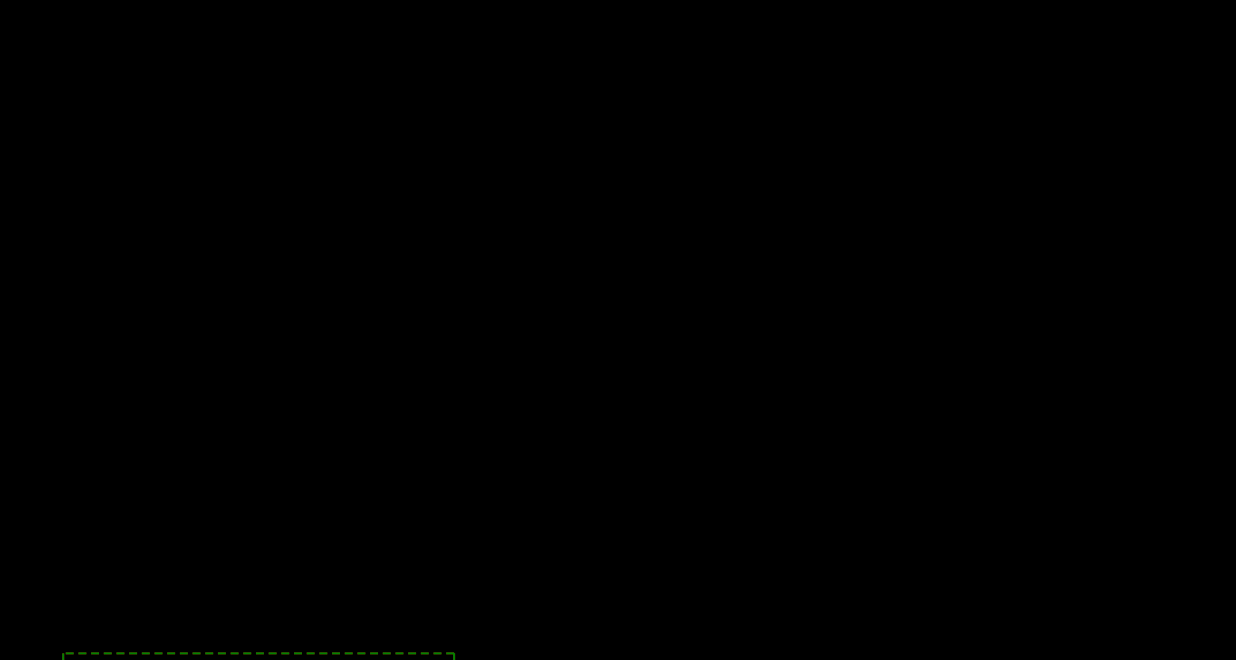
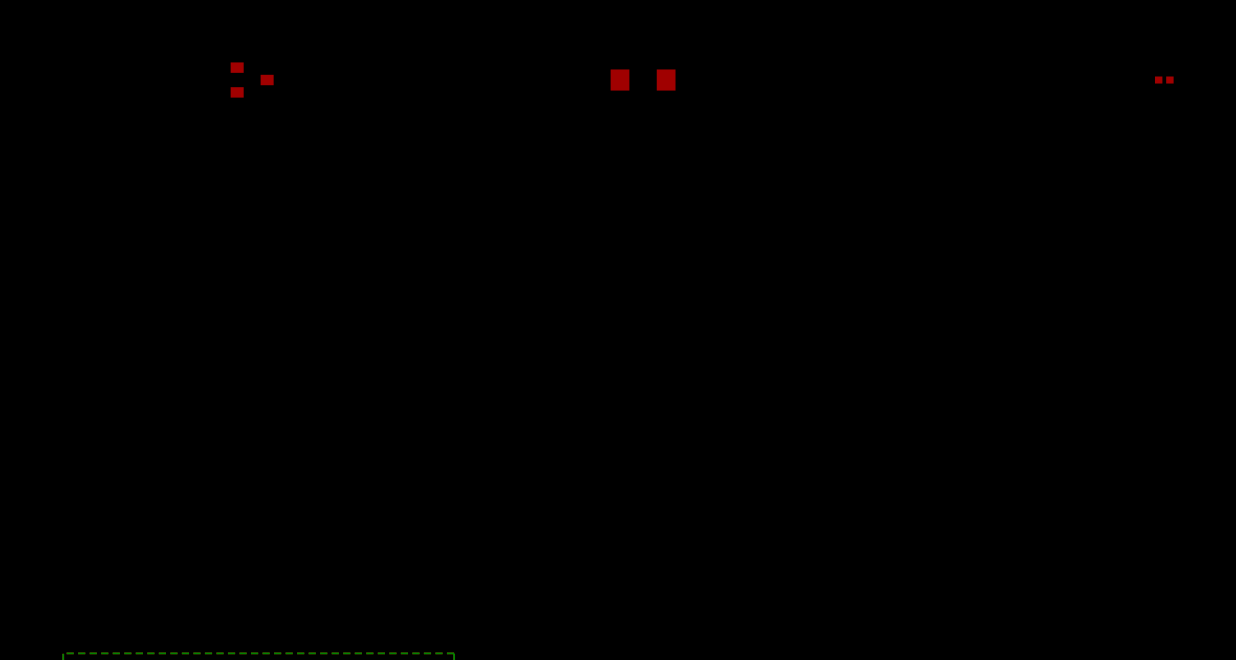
part: none -> (252, 80)
part: none -> (643, 80)
part: none -> (1164, 80)

